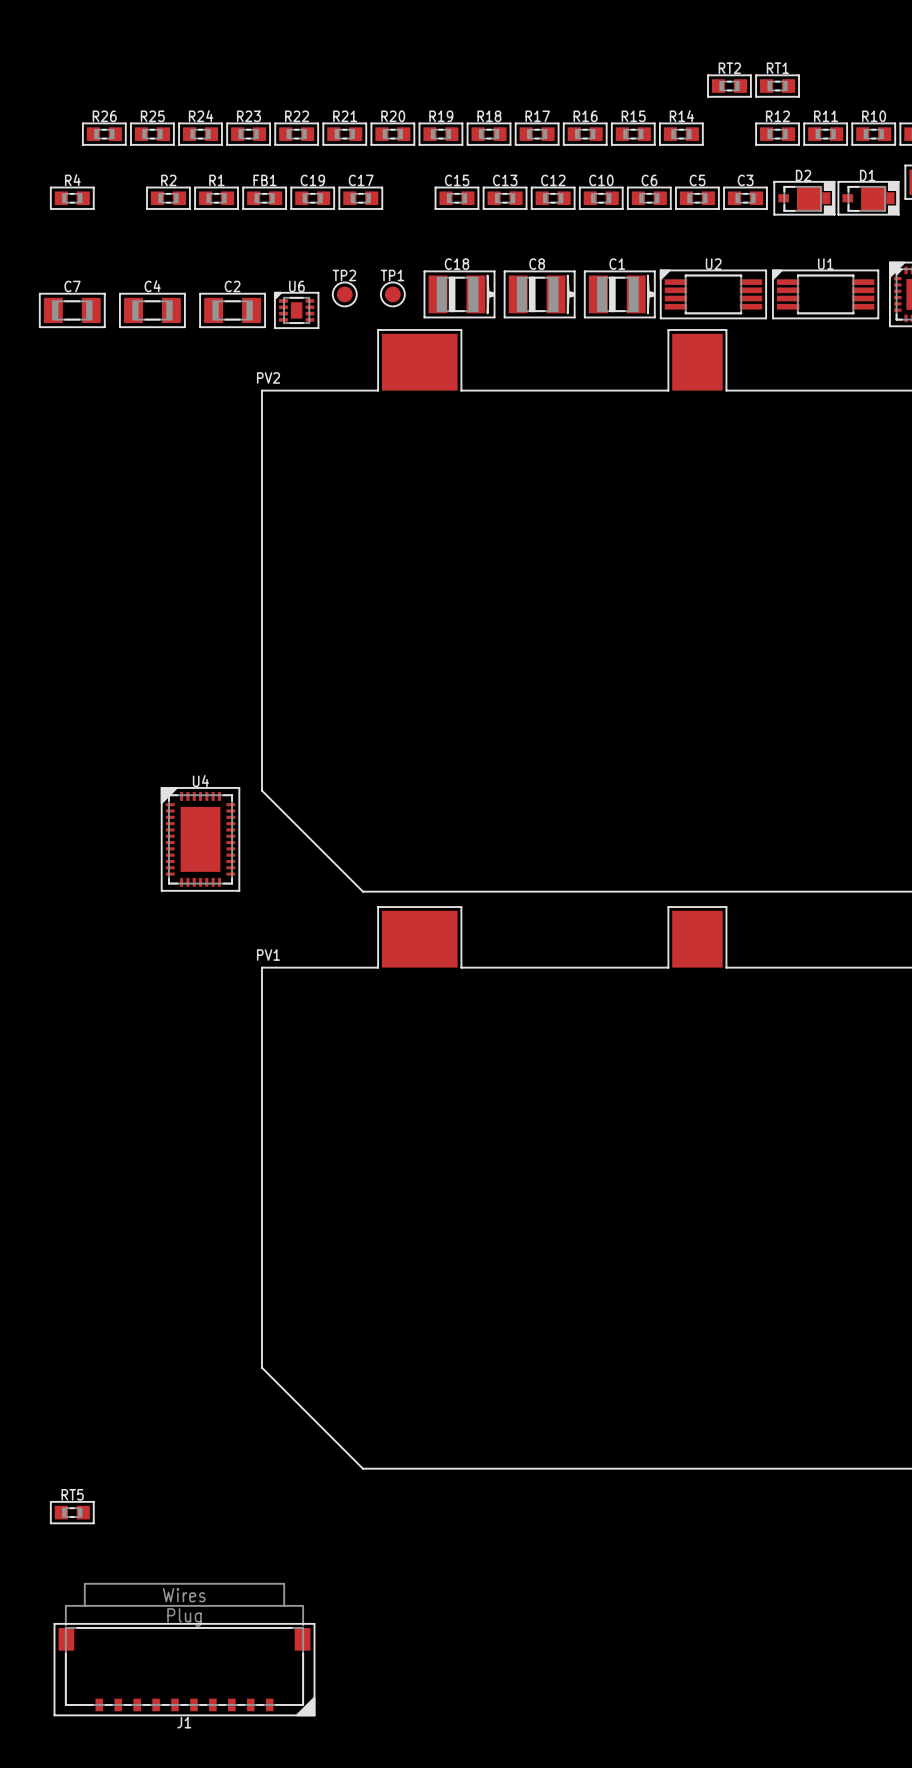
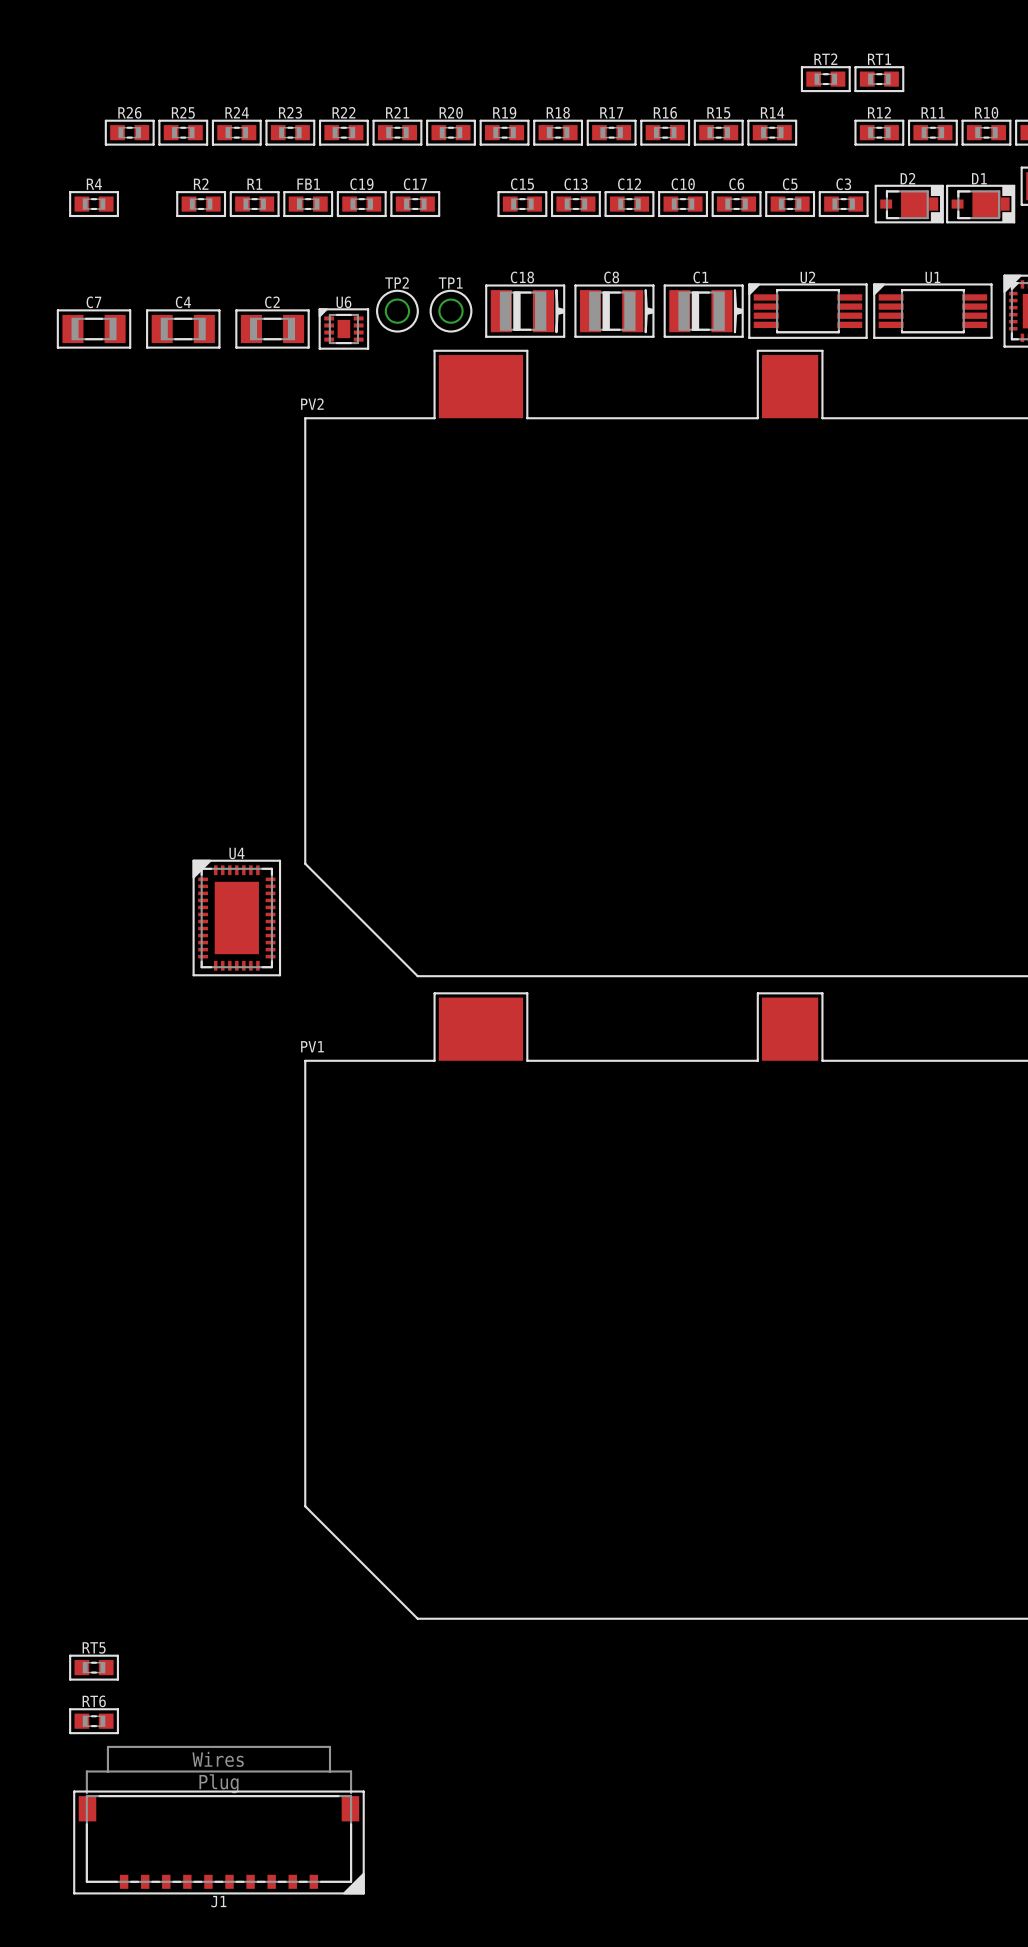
TP2 footprint: [331, 281, 358, 308] -> [376, 289, 419, 333]
TP1 footprint: [379, 281, 406, 308] -> [429, 289, 473, 333]
RT6: none -> (94, 1721)

